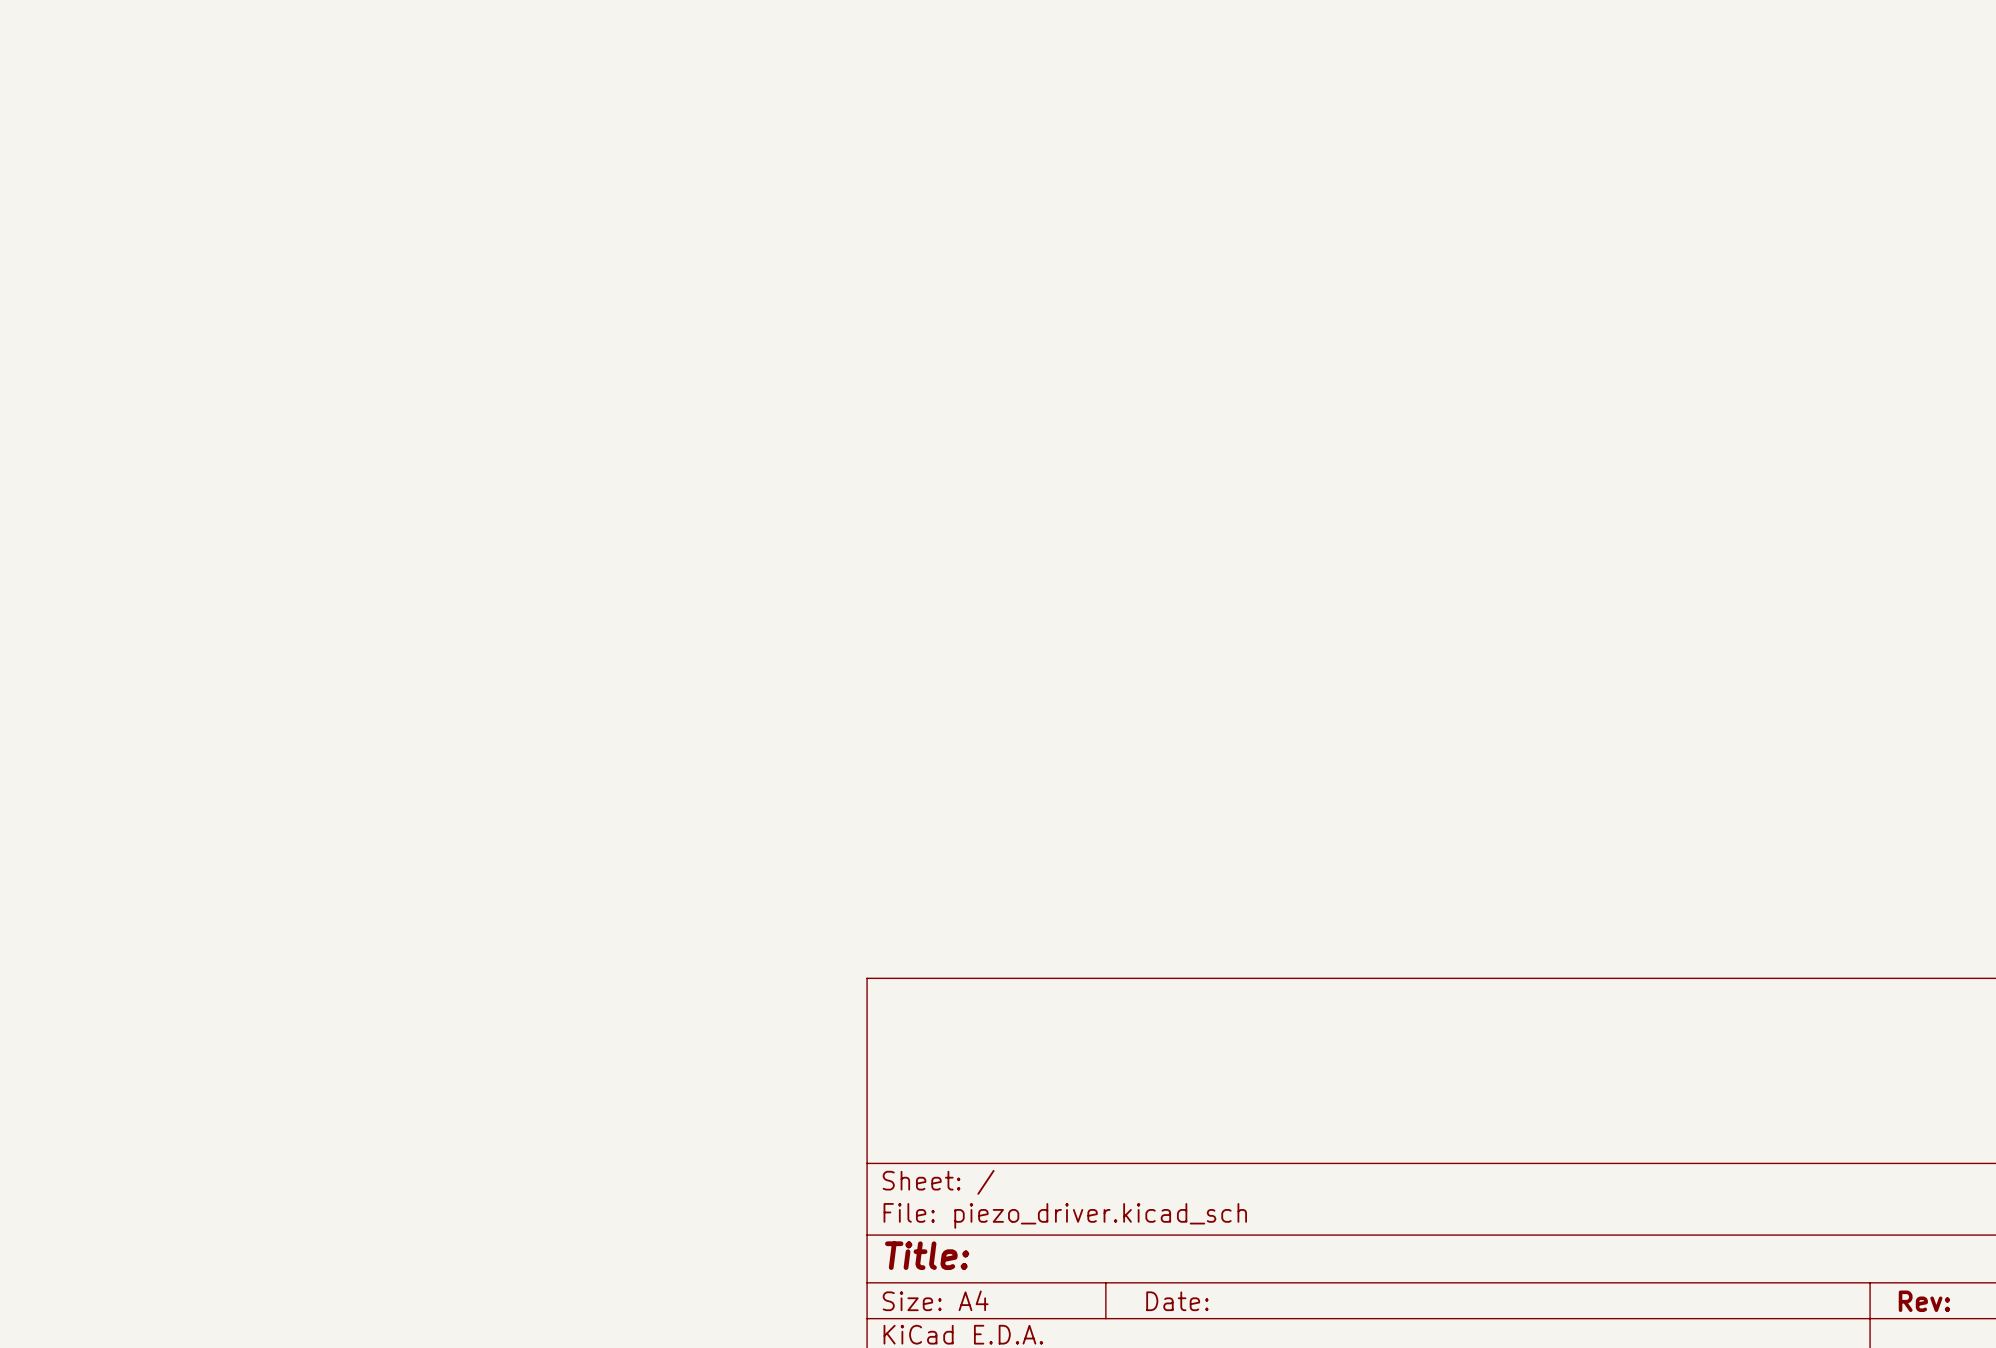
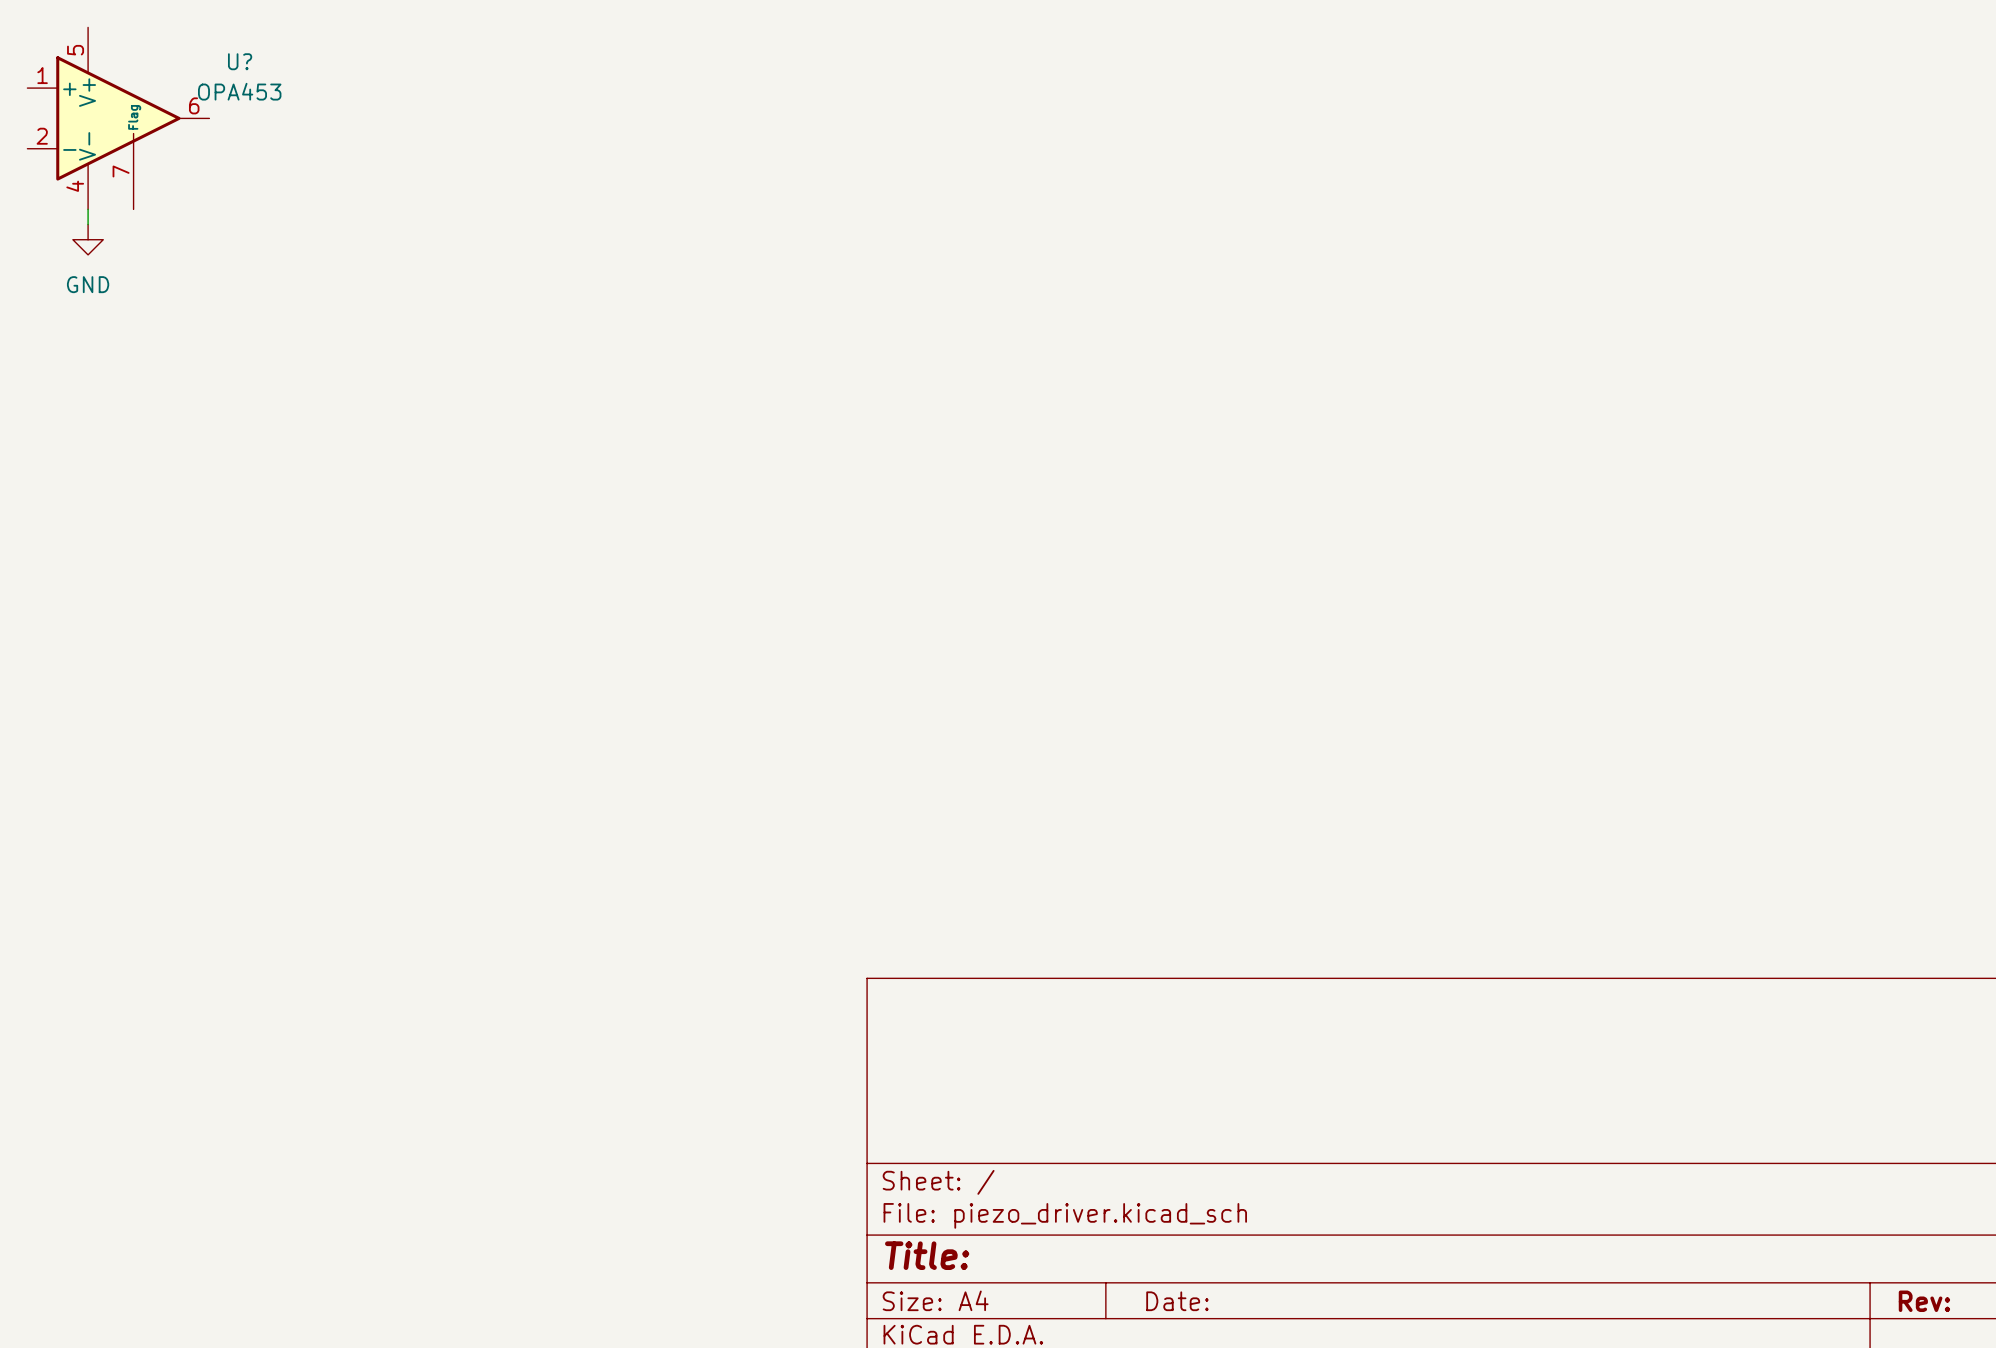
U?: none -> OPA453 (118, 118)
wire: none -> (88, 209) (88, 224)
power symbol: none -> GND (88, 239)

